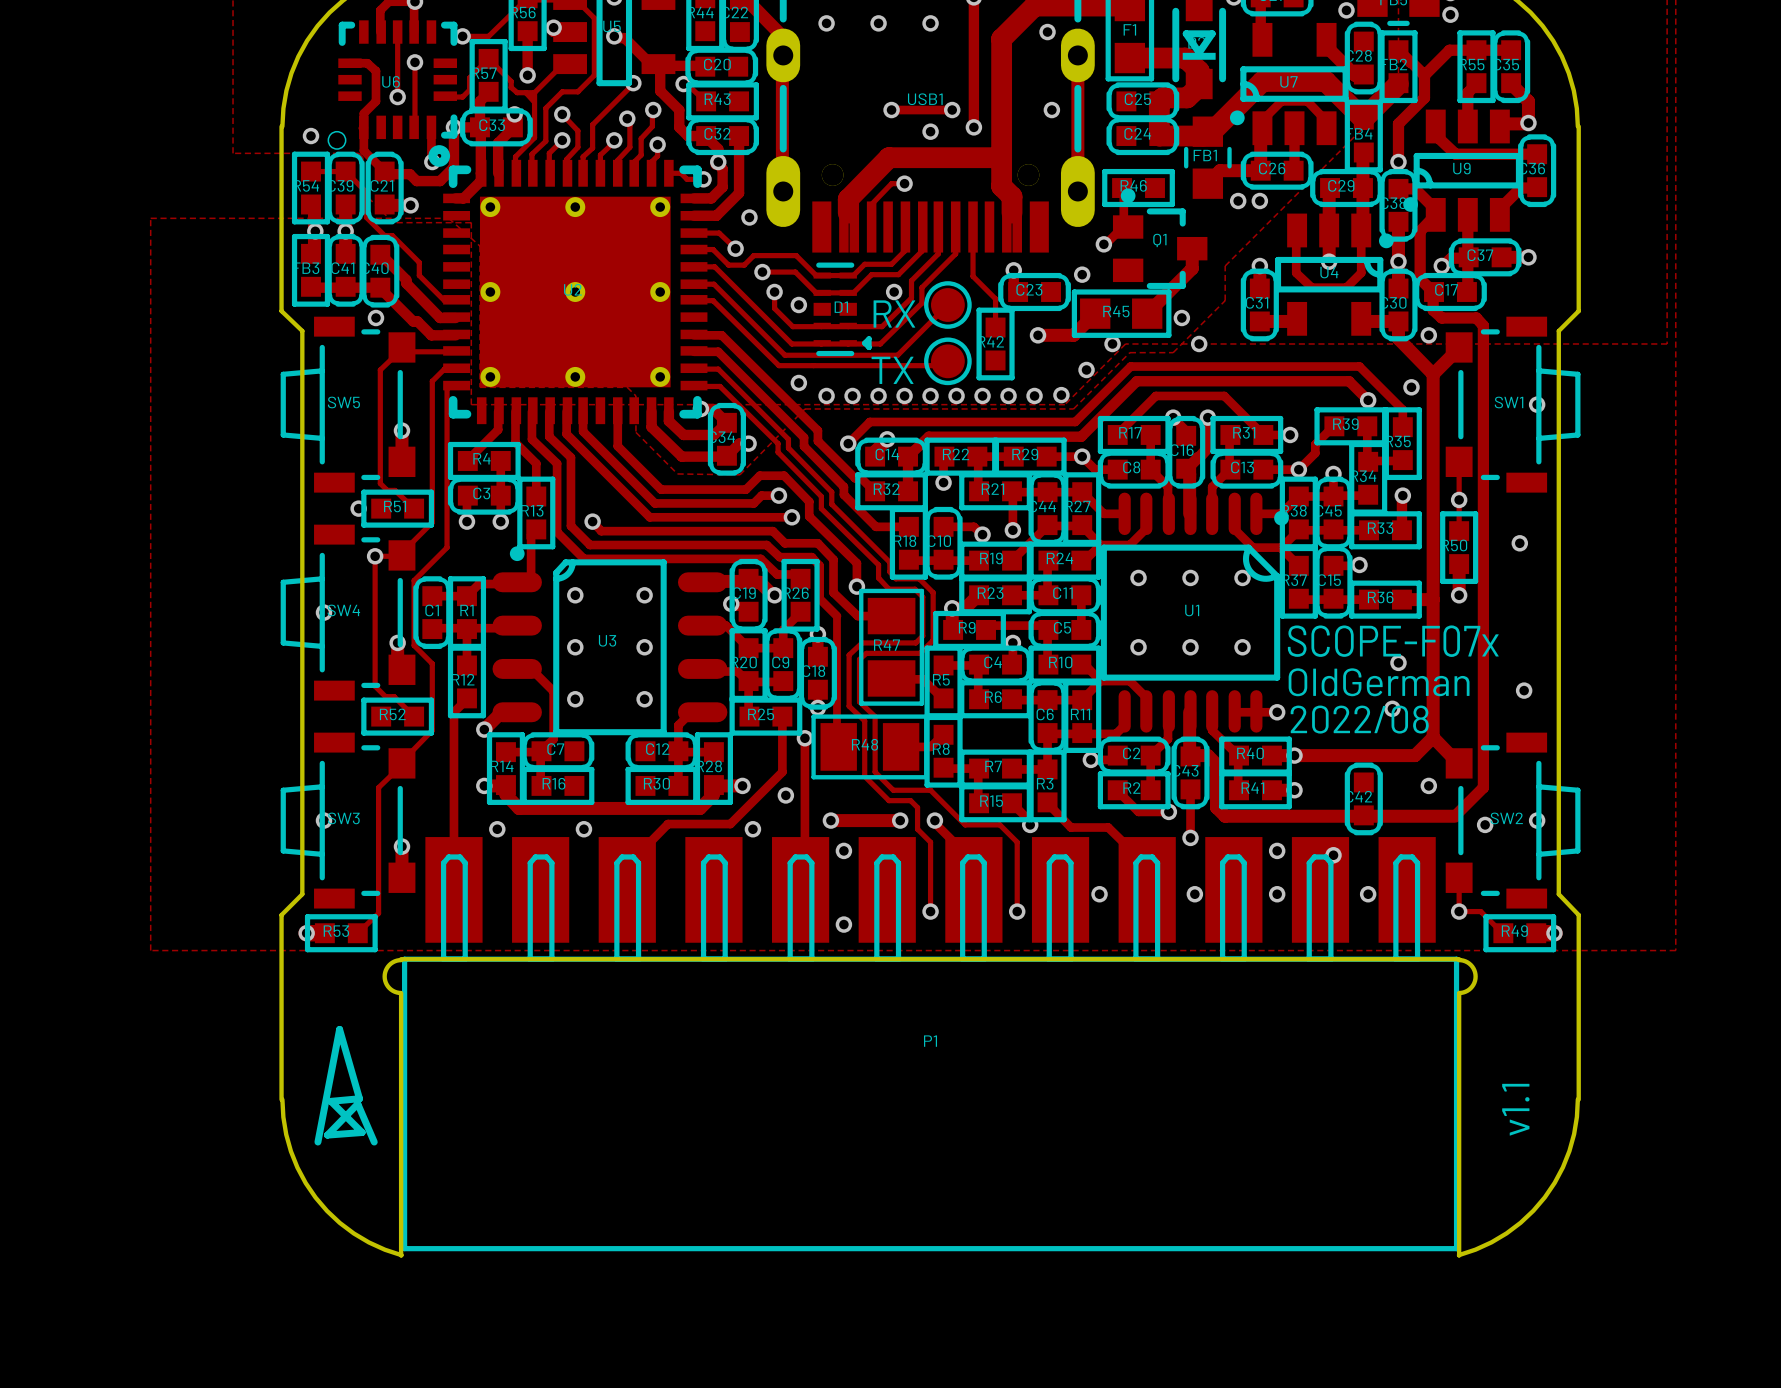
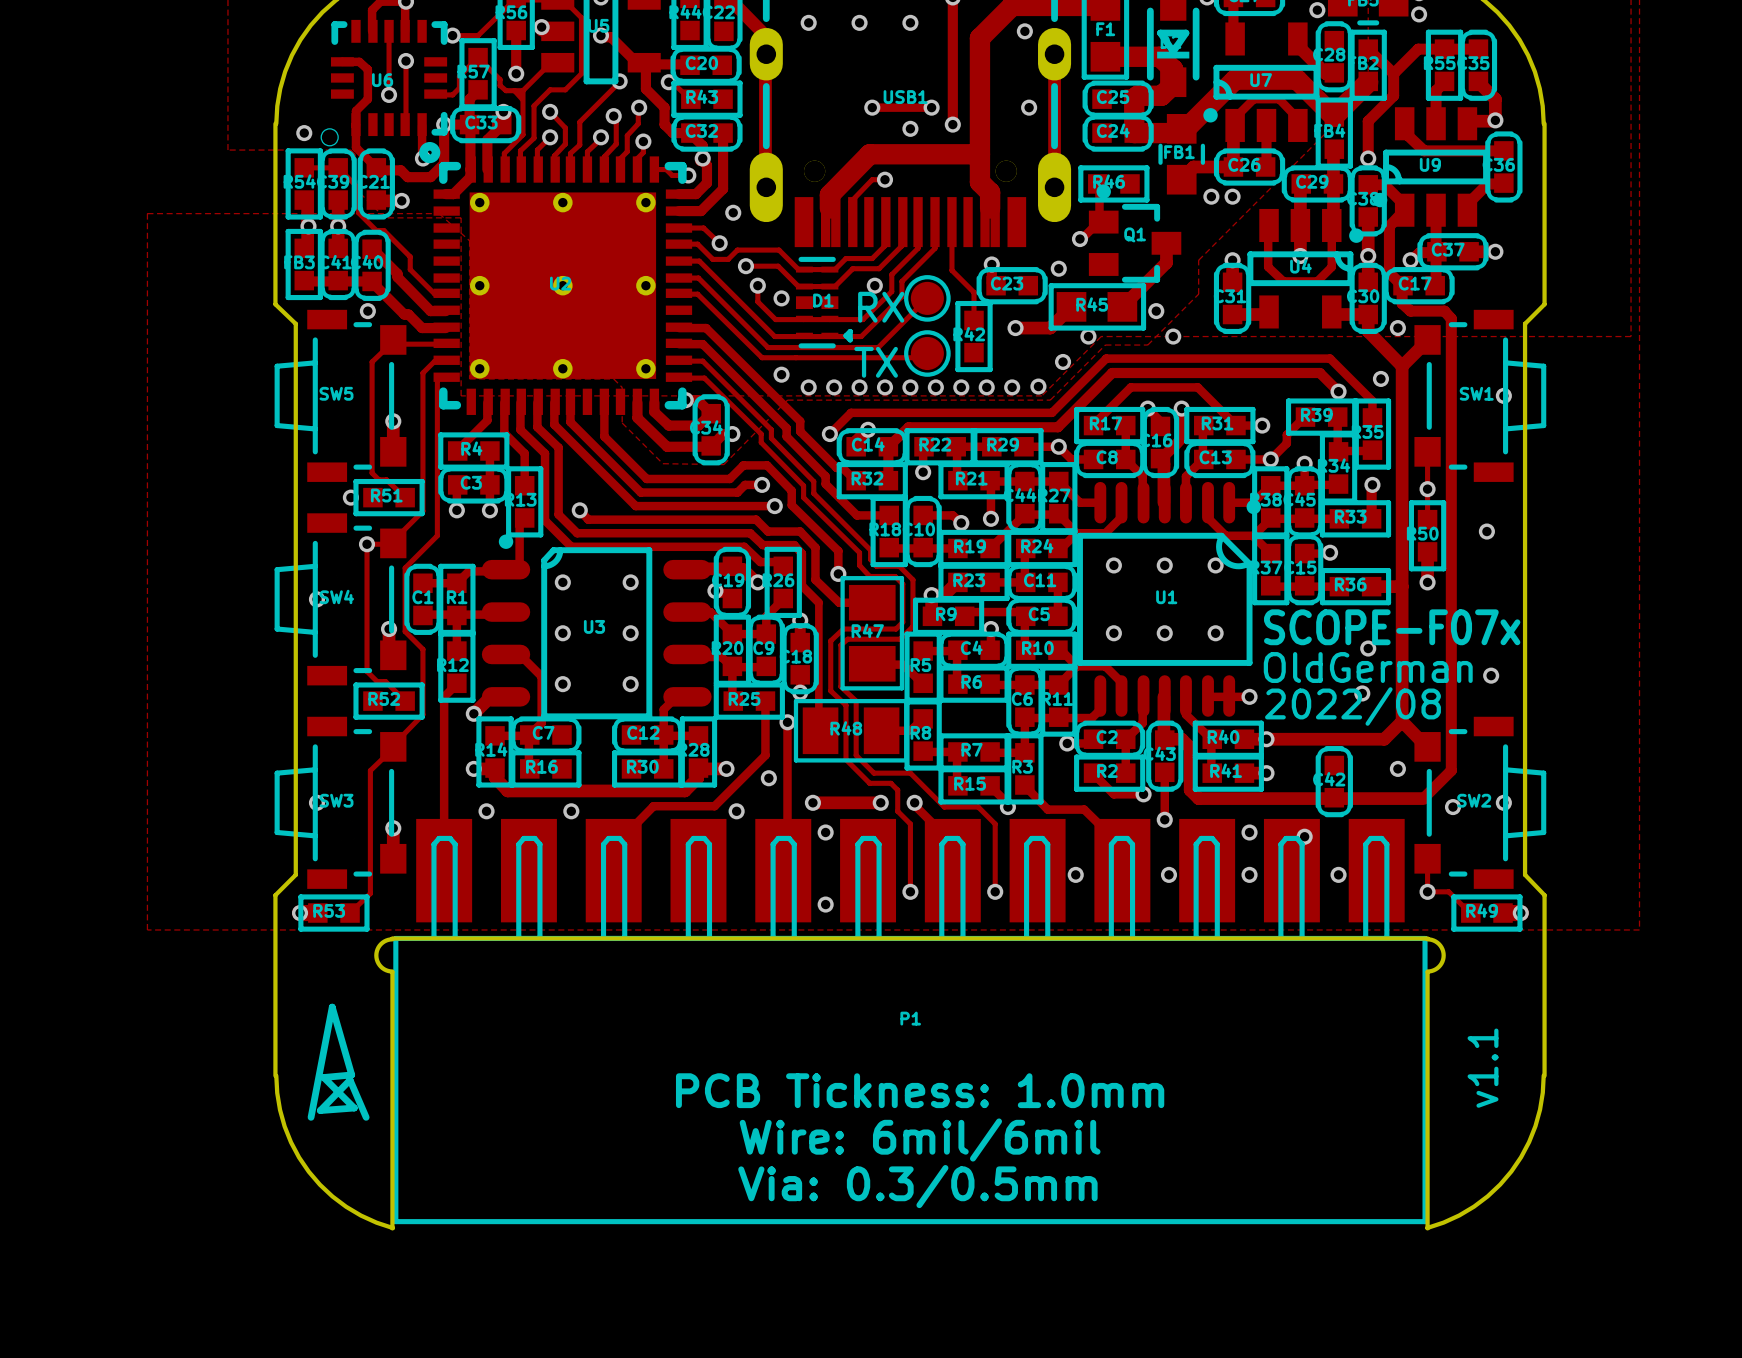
text: none -> PCB Tickness: 1.0mm (920, 1090)
text: none -> Wire: 6mil/6mil (920, 1140)
text: none -> Via: 0.3/0.5mm (917, 1186)

